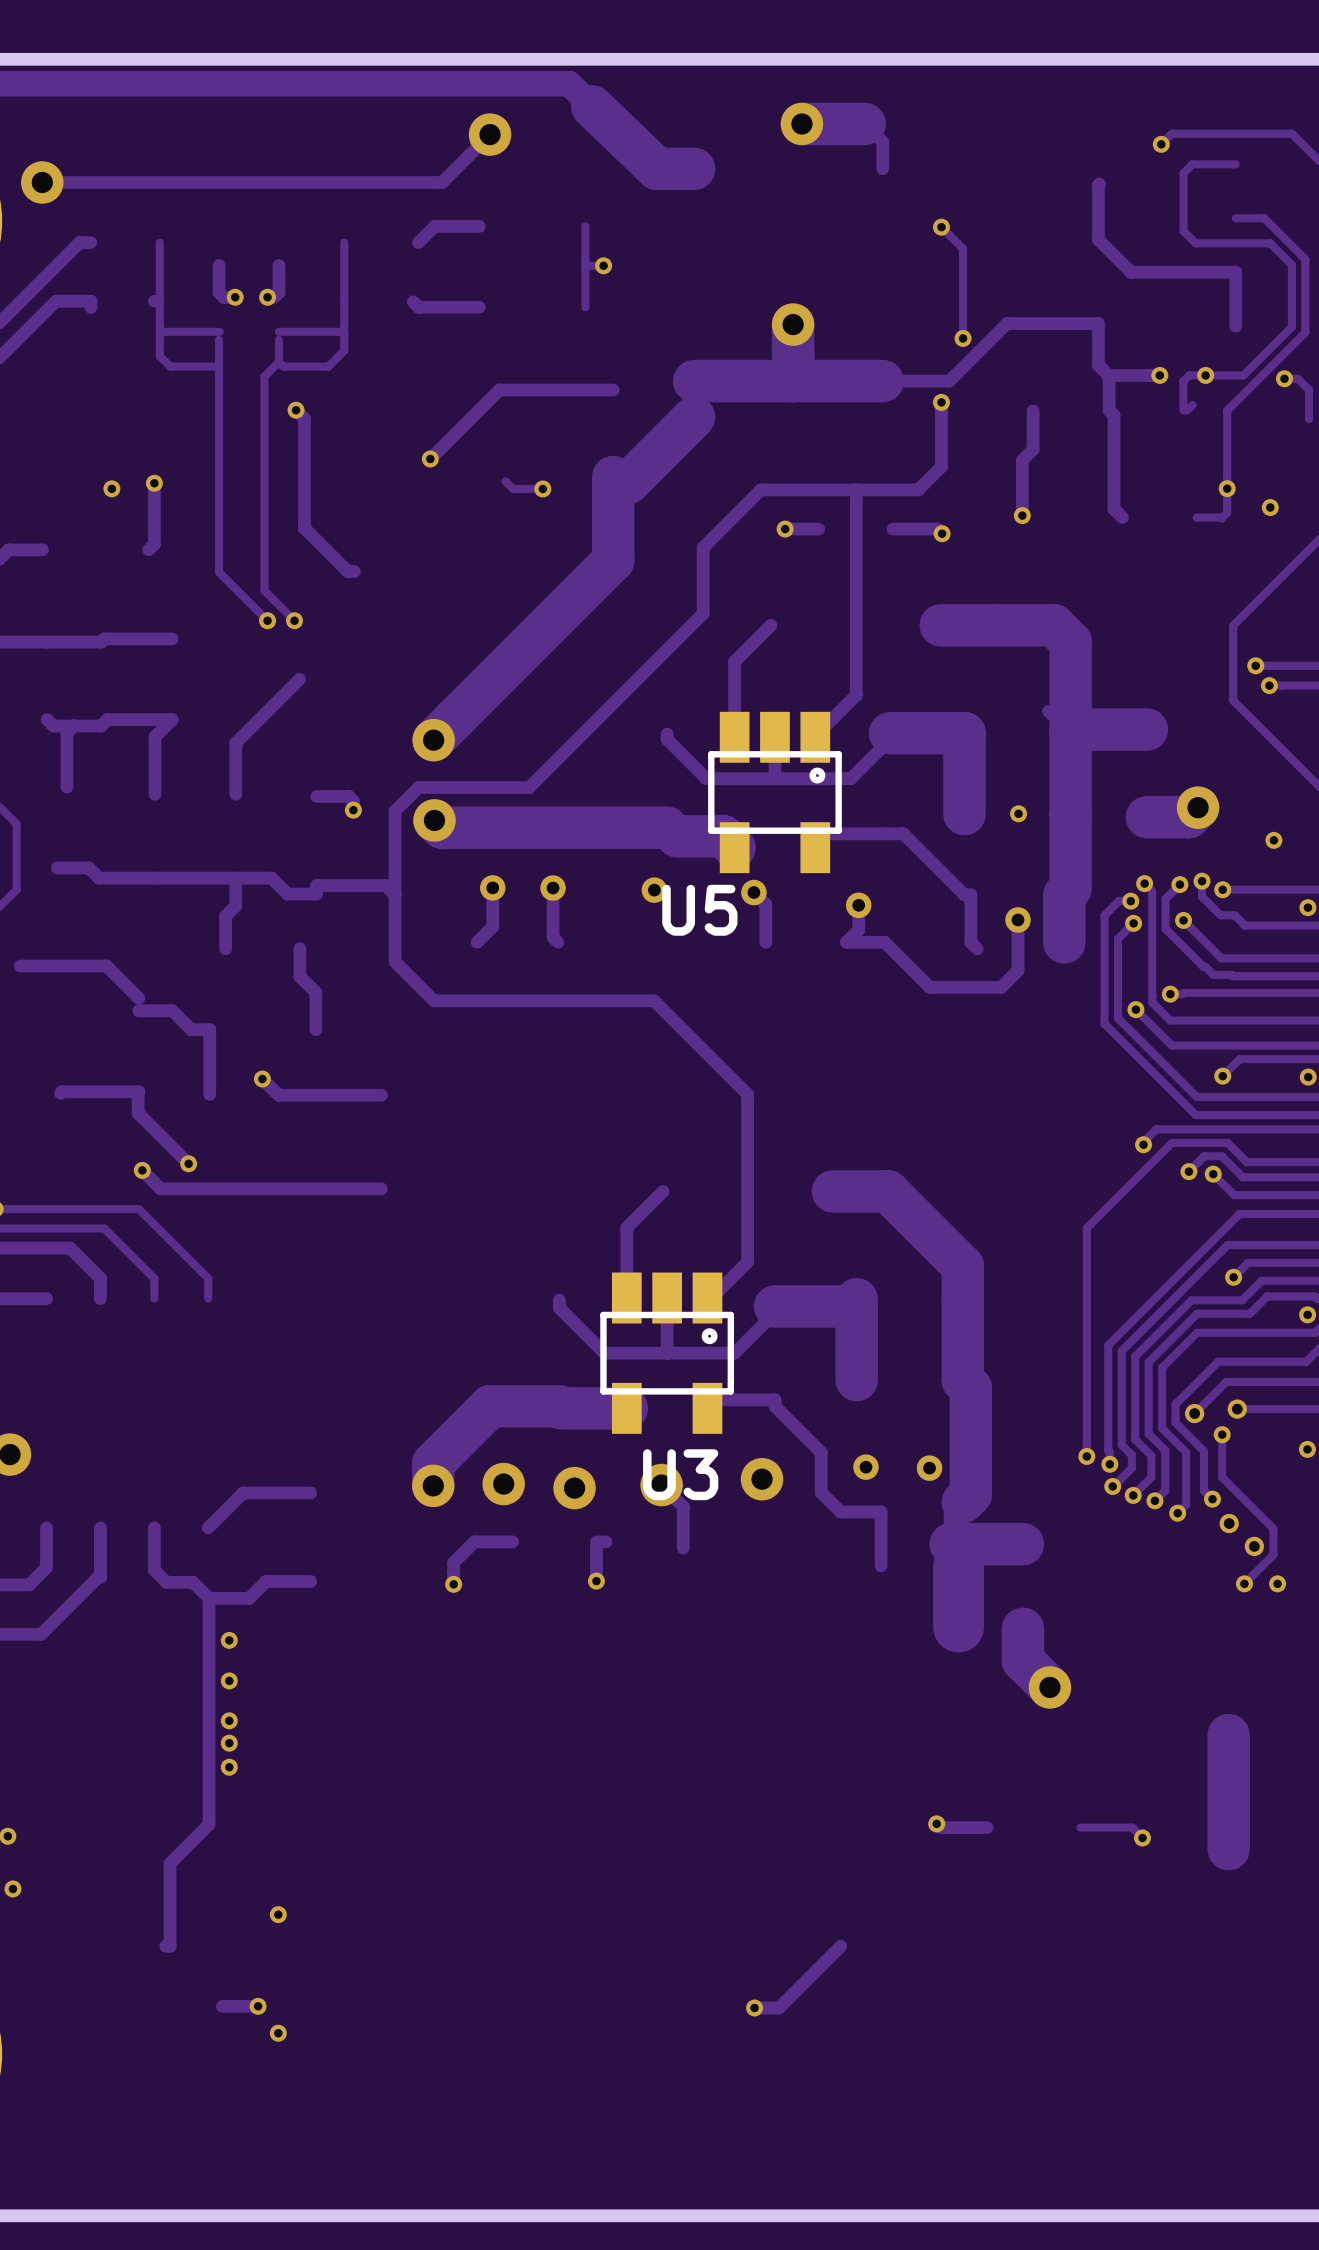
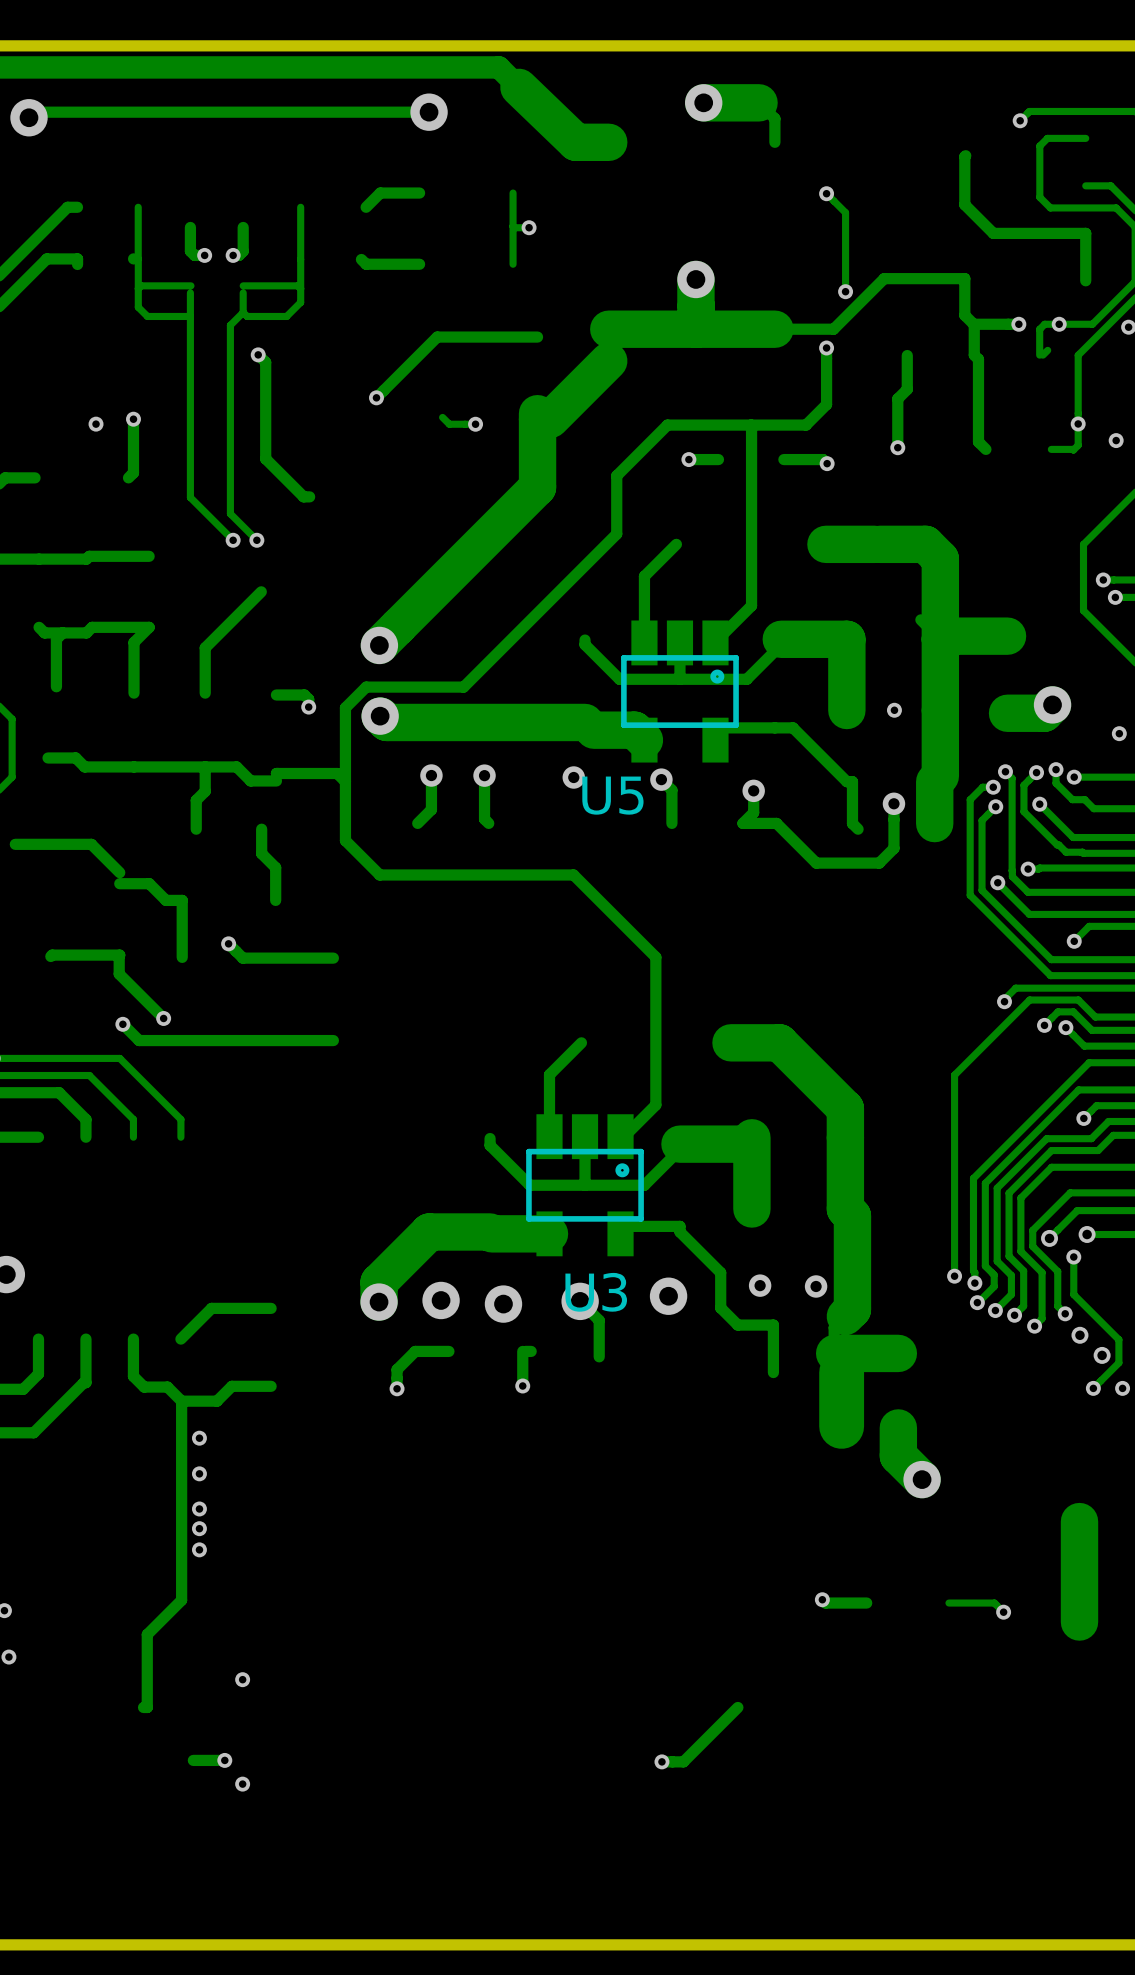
track: (490, 134) (442, 182) (42, 182) -> (429, 112) (34, 112) (29, 117)
via position: (42, 182) -> (29, 117)

